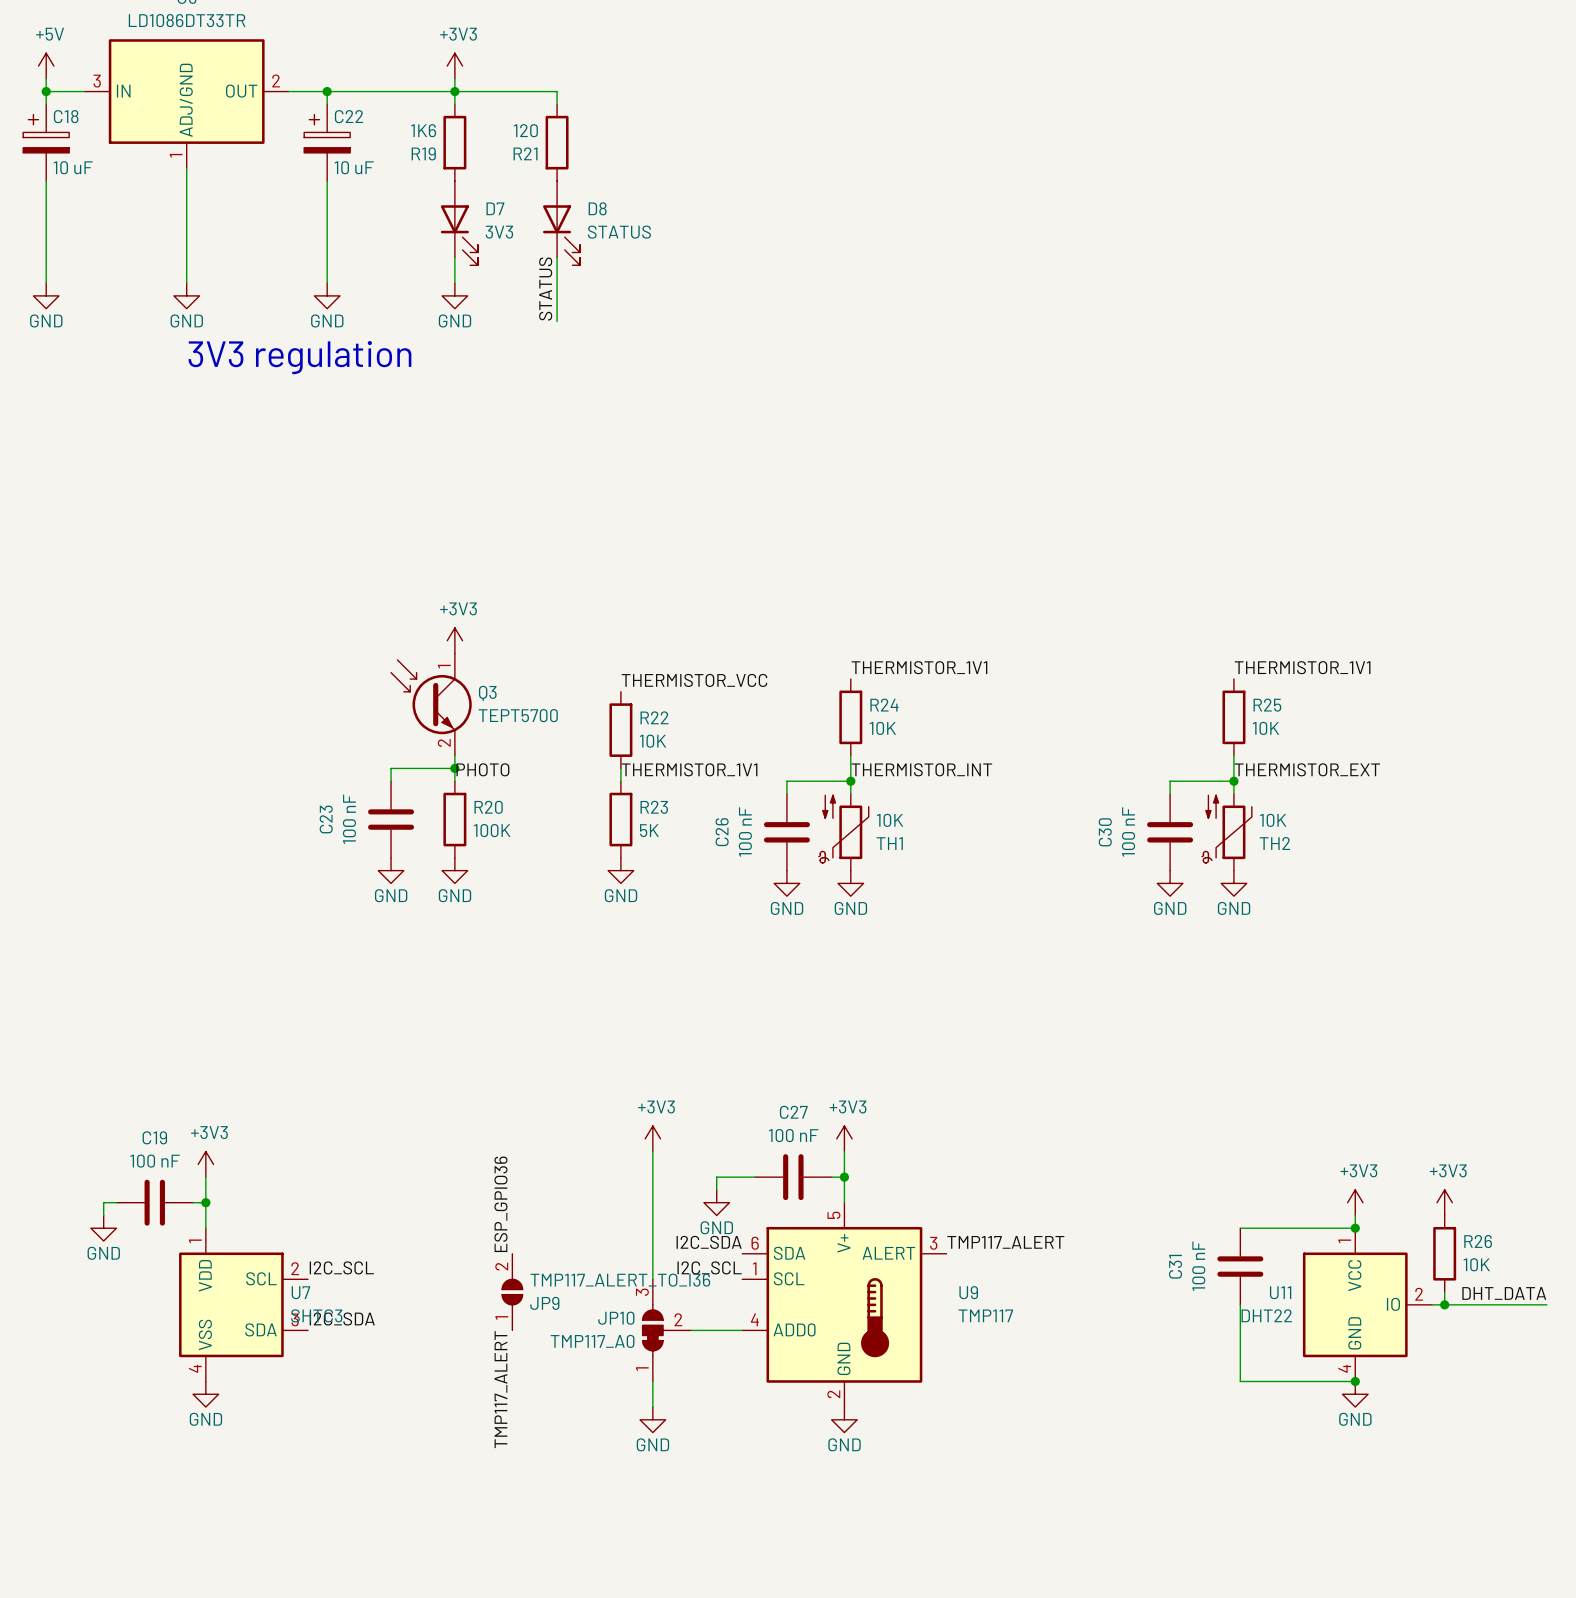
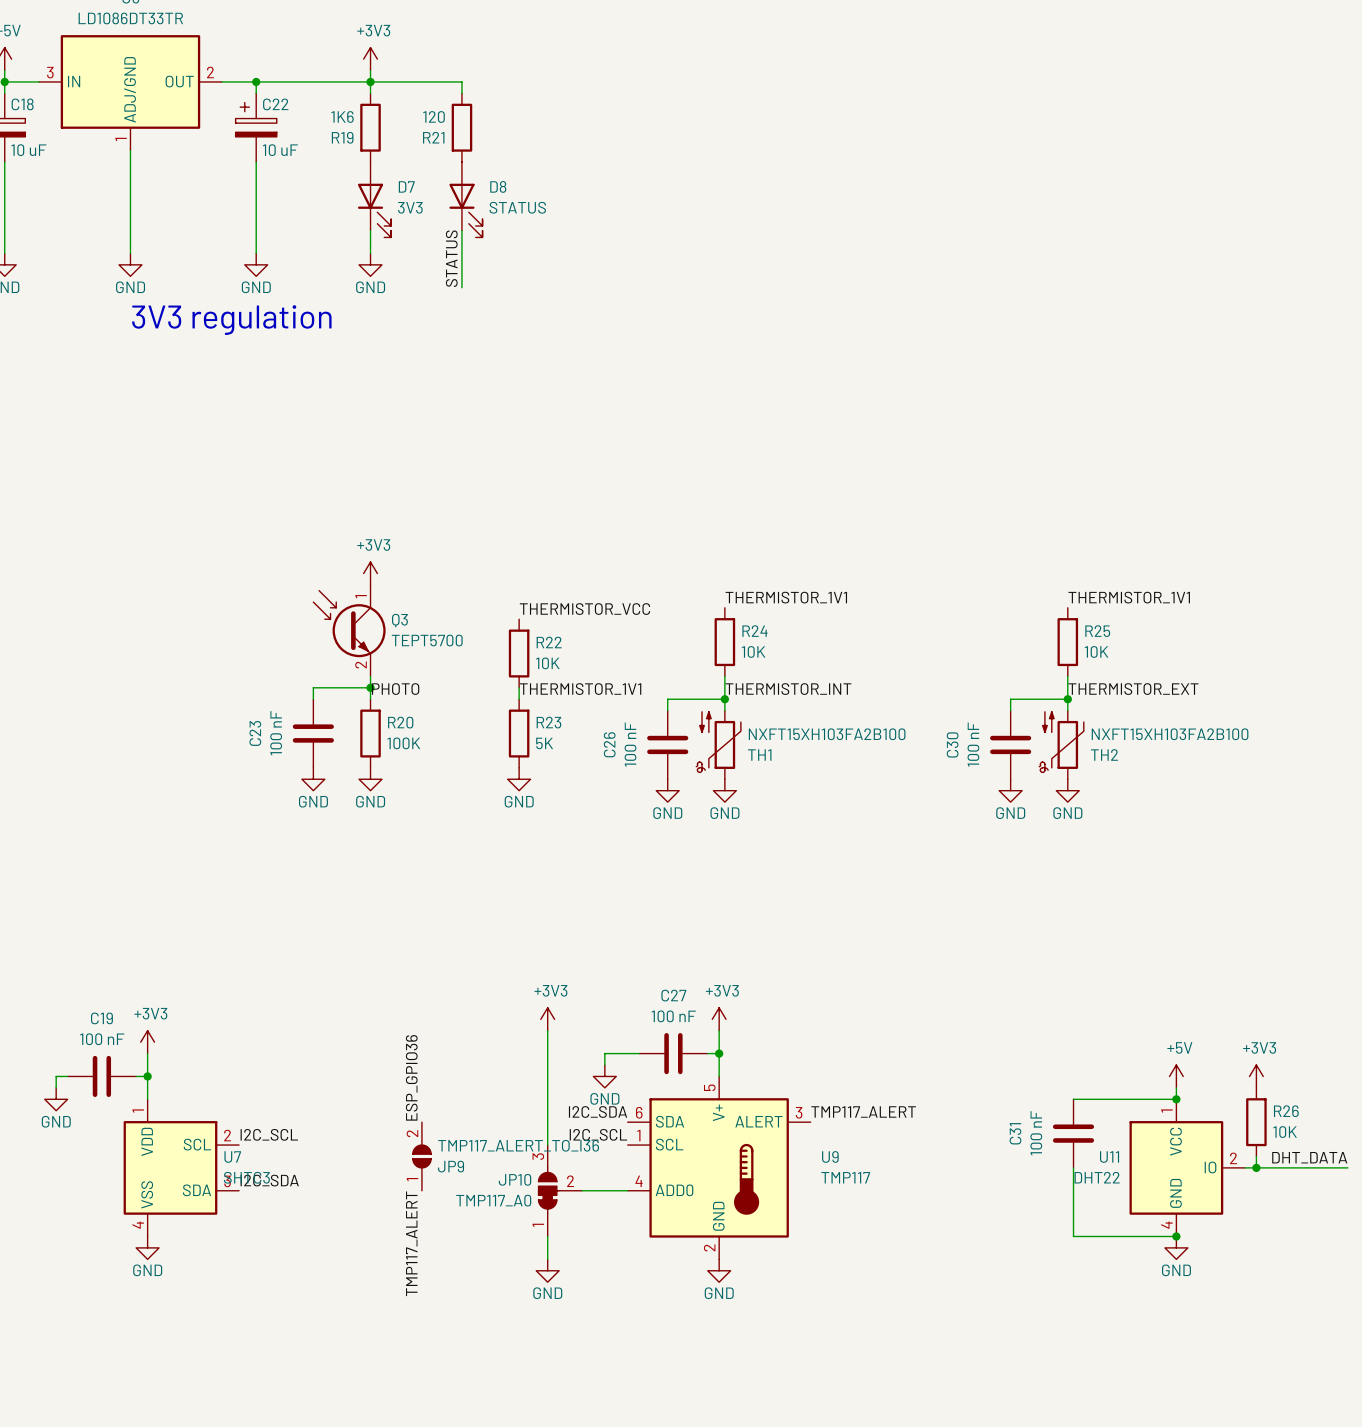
TH1 value: 10K (890, 820) -> NXFT15XH103FA2B100 (827, 734)
TH2 value: 10K (1273, 820) -> NXFT15XH103FA2B100 (1170, 734)
power symbol: +3V3 (1355, 1202) -> +5V (1176, 1076)

